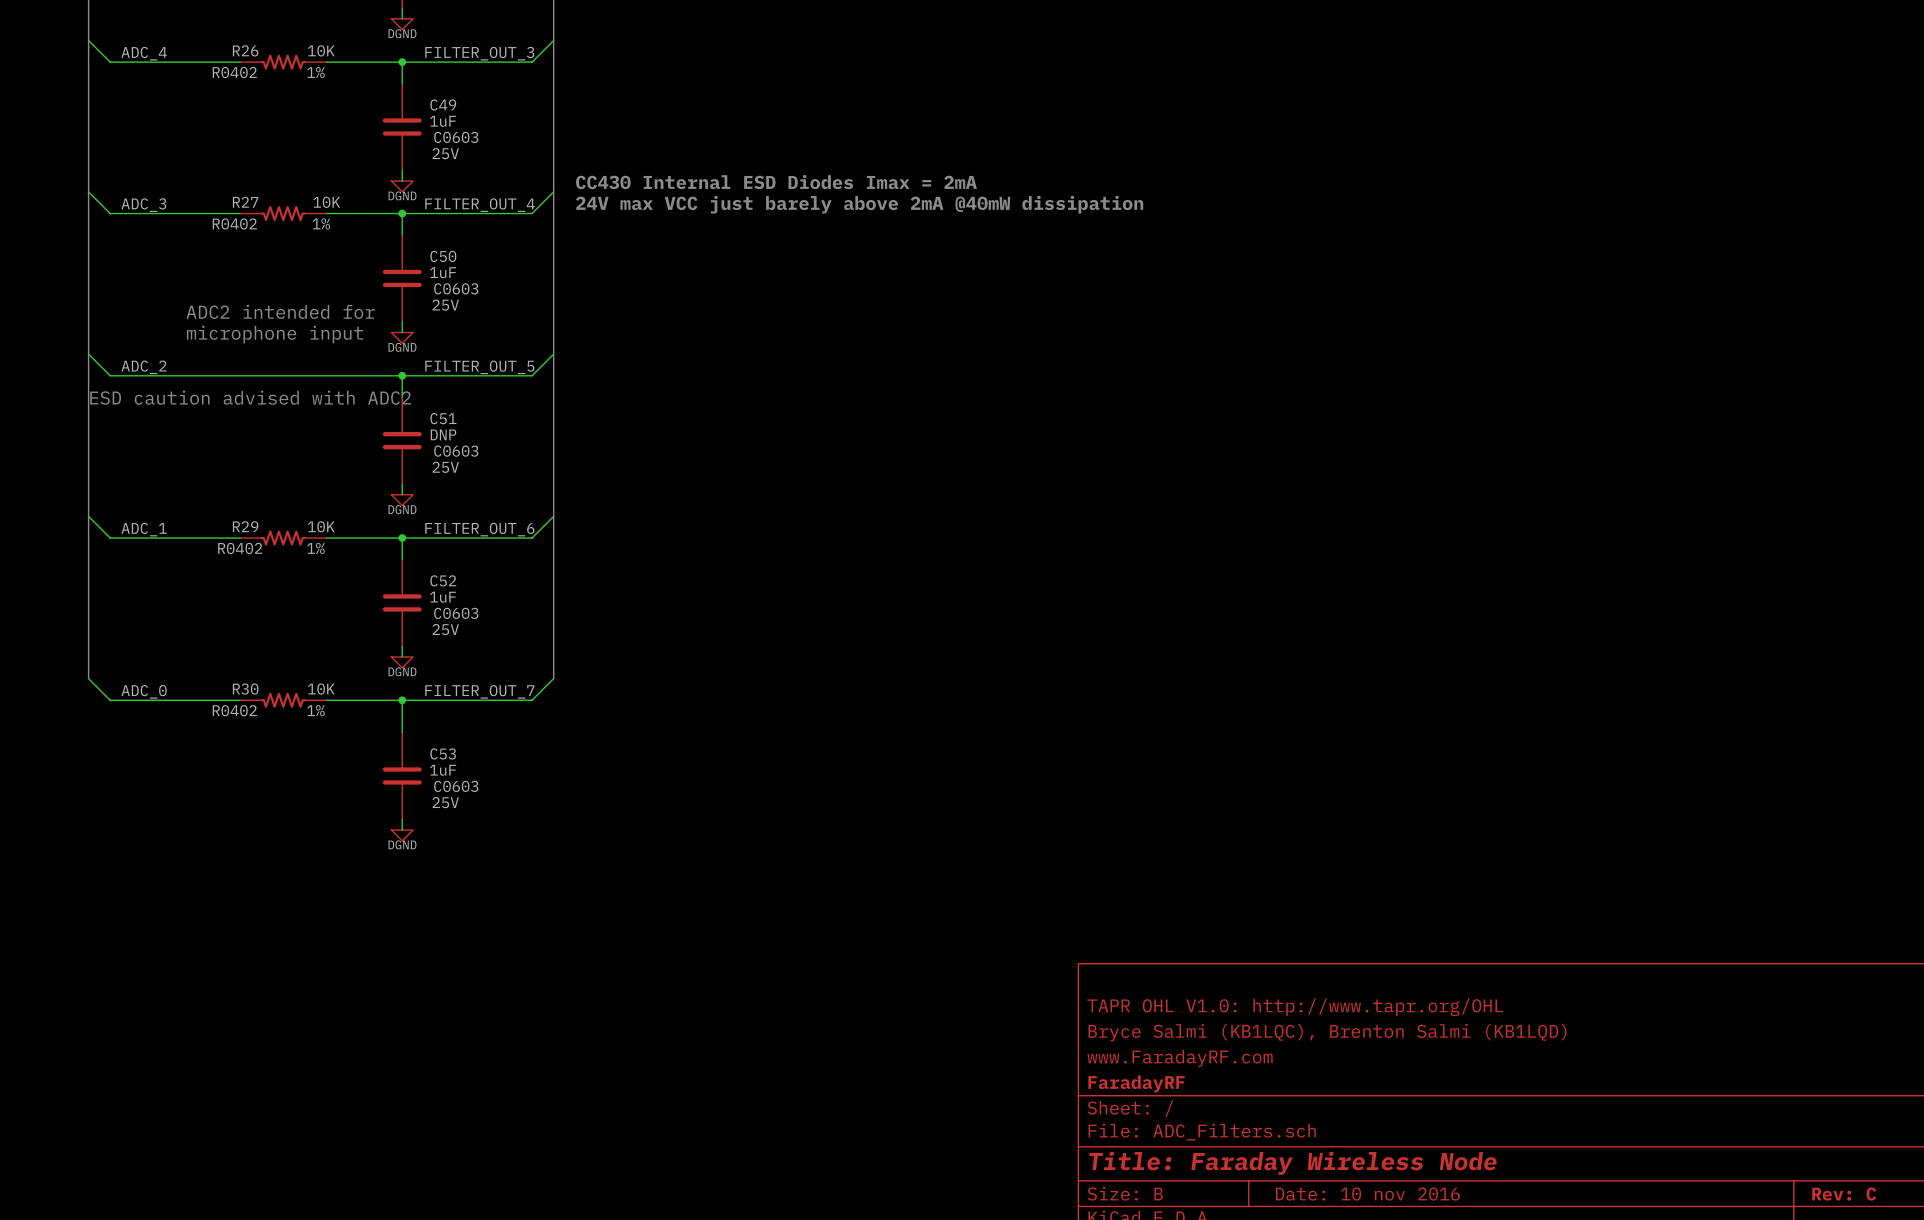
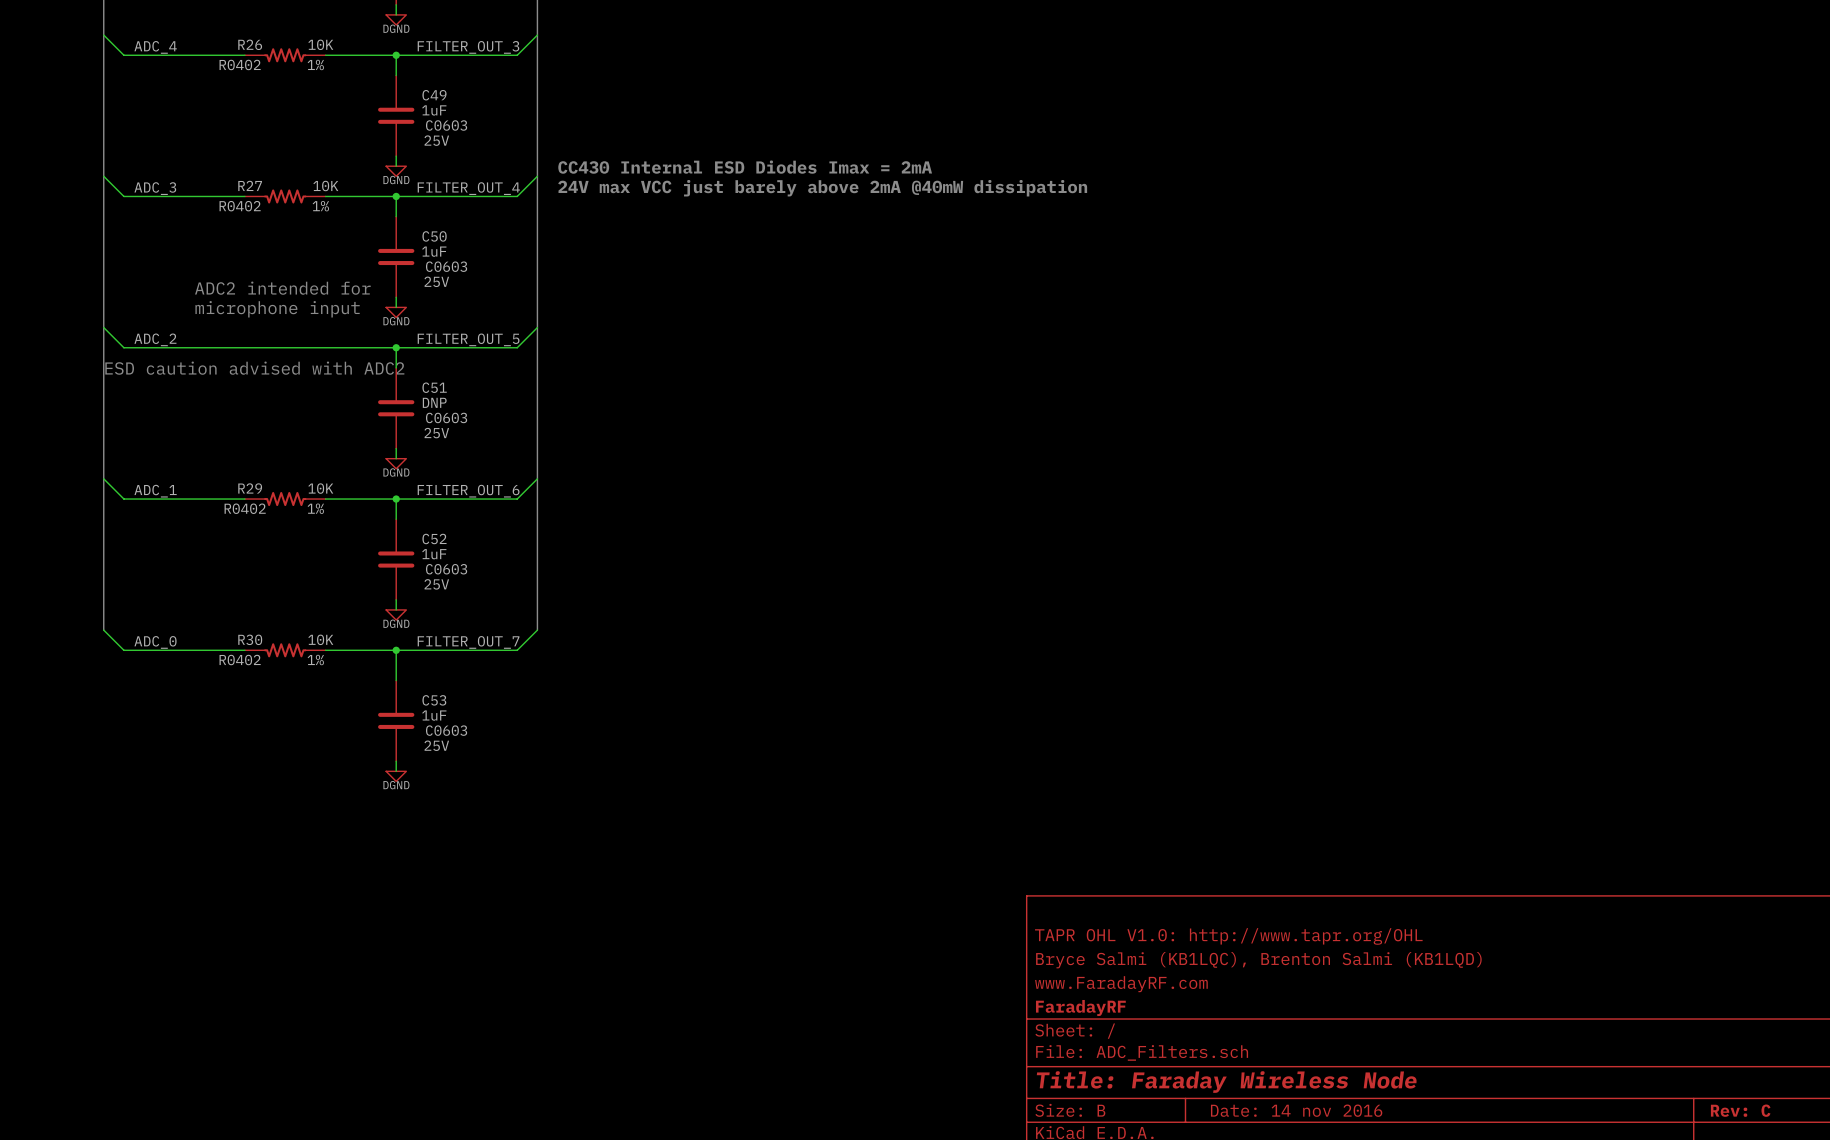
title block: Date: 10 nov 2016 (1367, 1194) -> Date: 14 nov 2016 (1296, 1110)

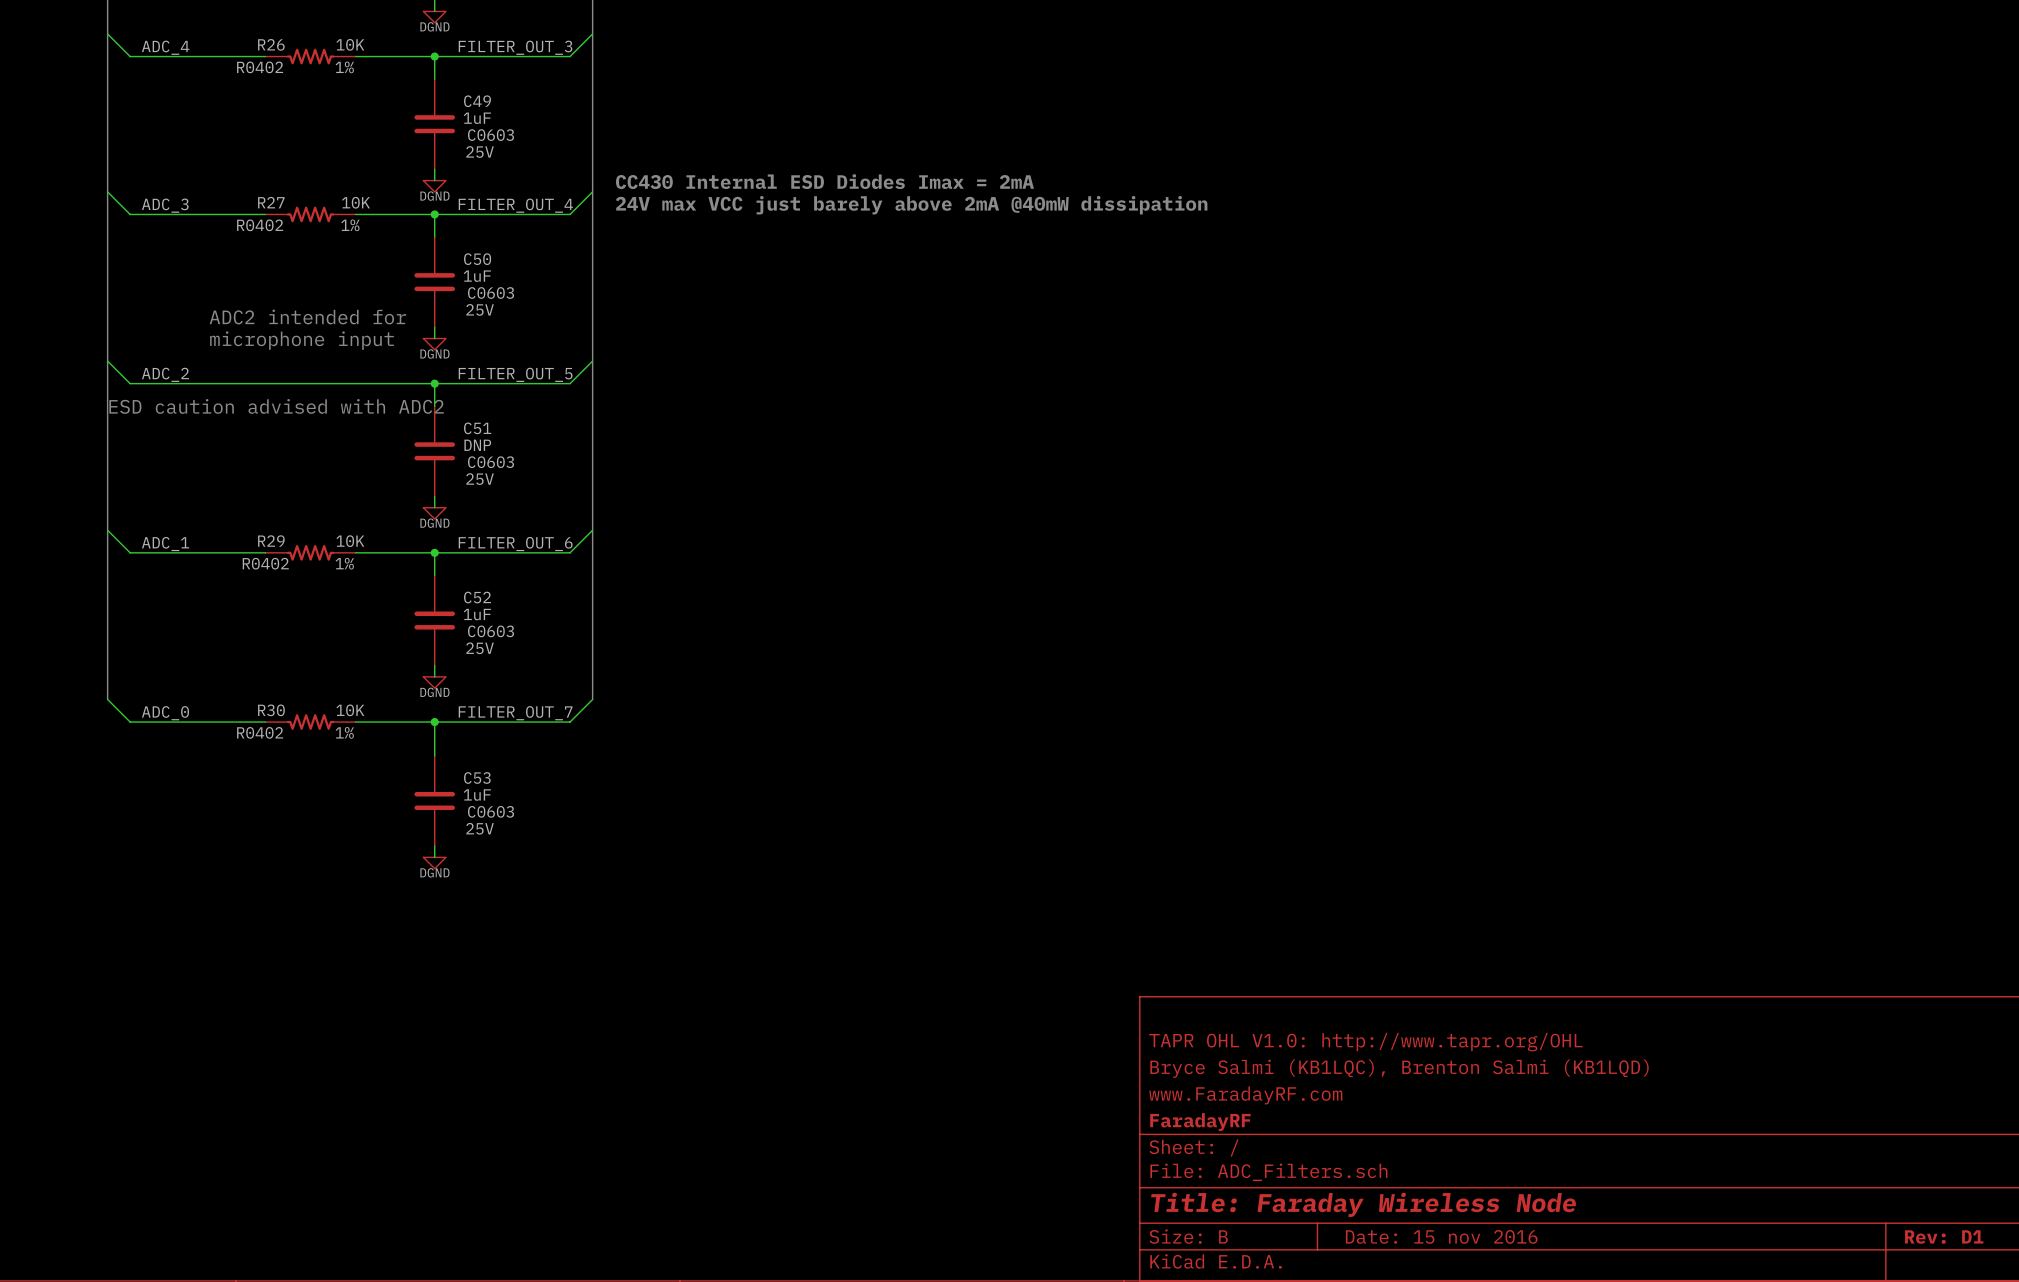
title block: Date: 14 nov 2016 (1296, 1110) -> Date: 15 nov 2016 (1441, 1236)
title block: Rev: C (1740, 1110) -> Rev: D1 (1944, 1237)

